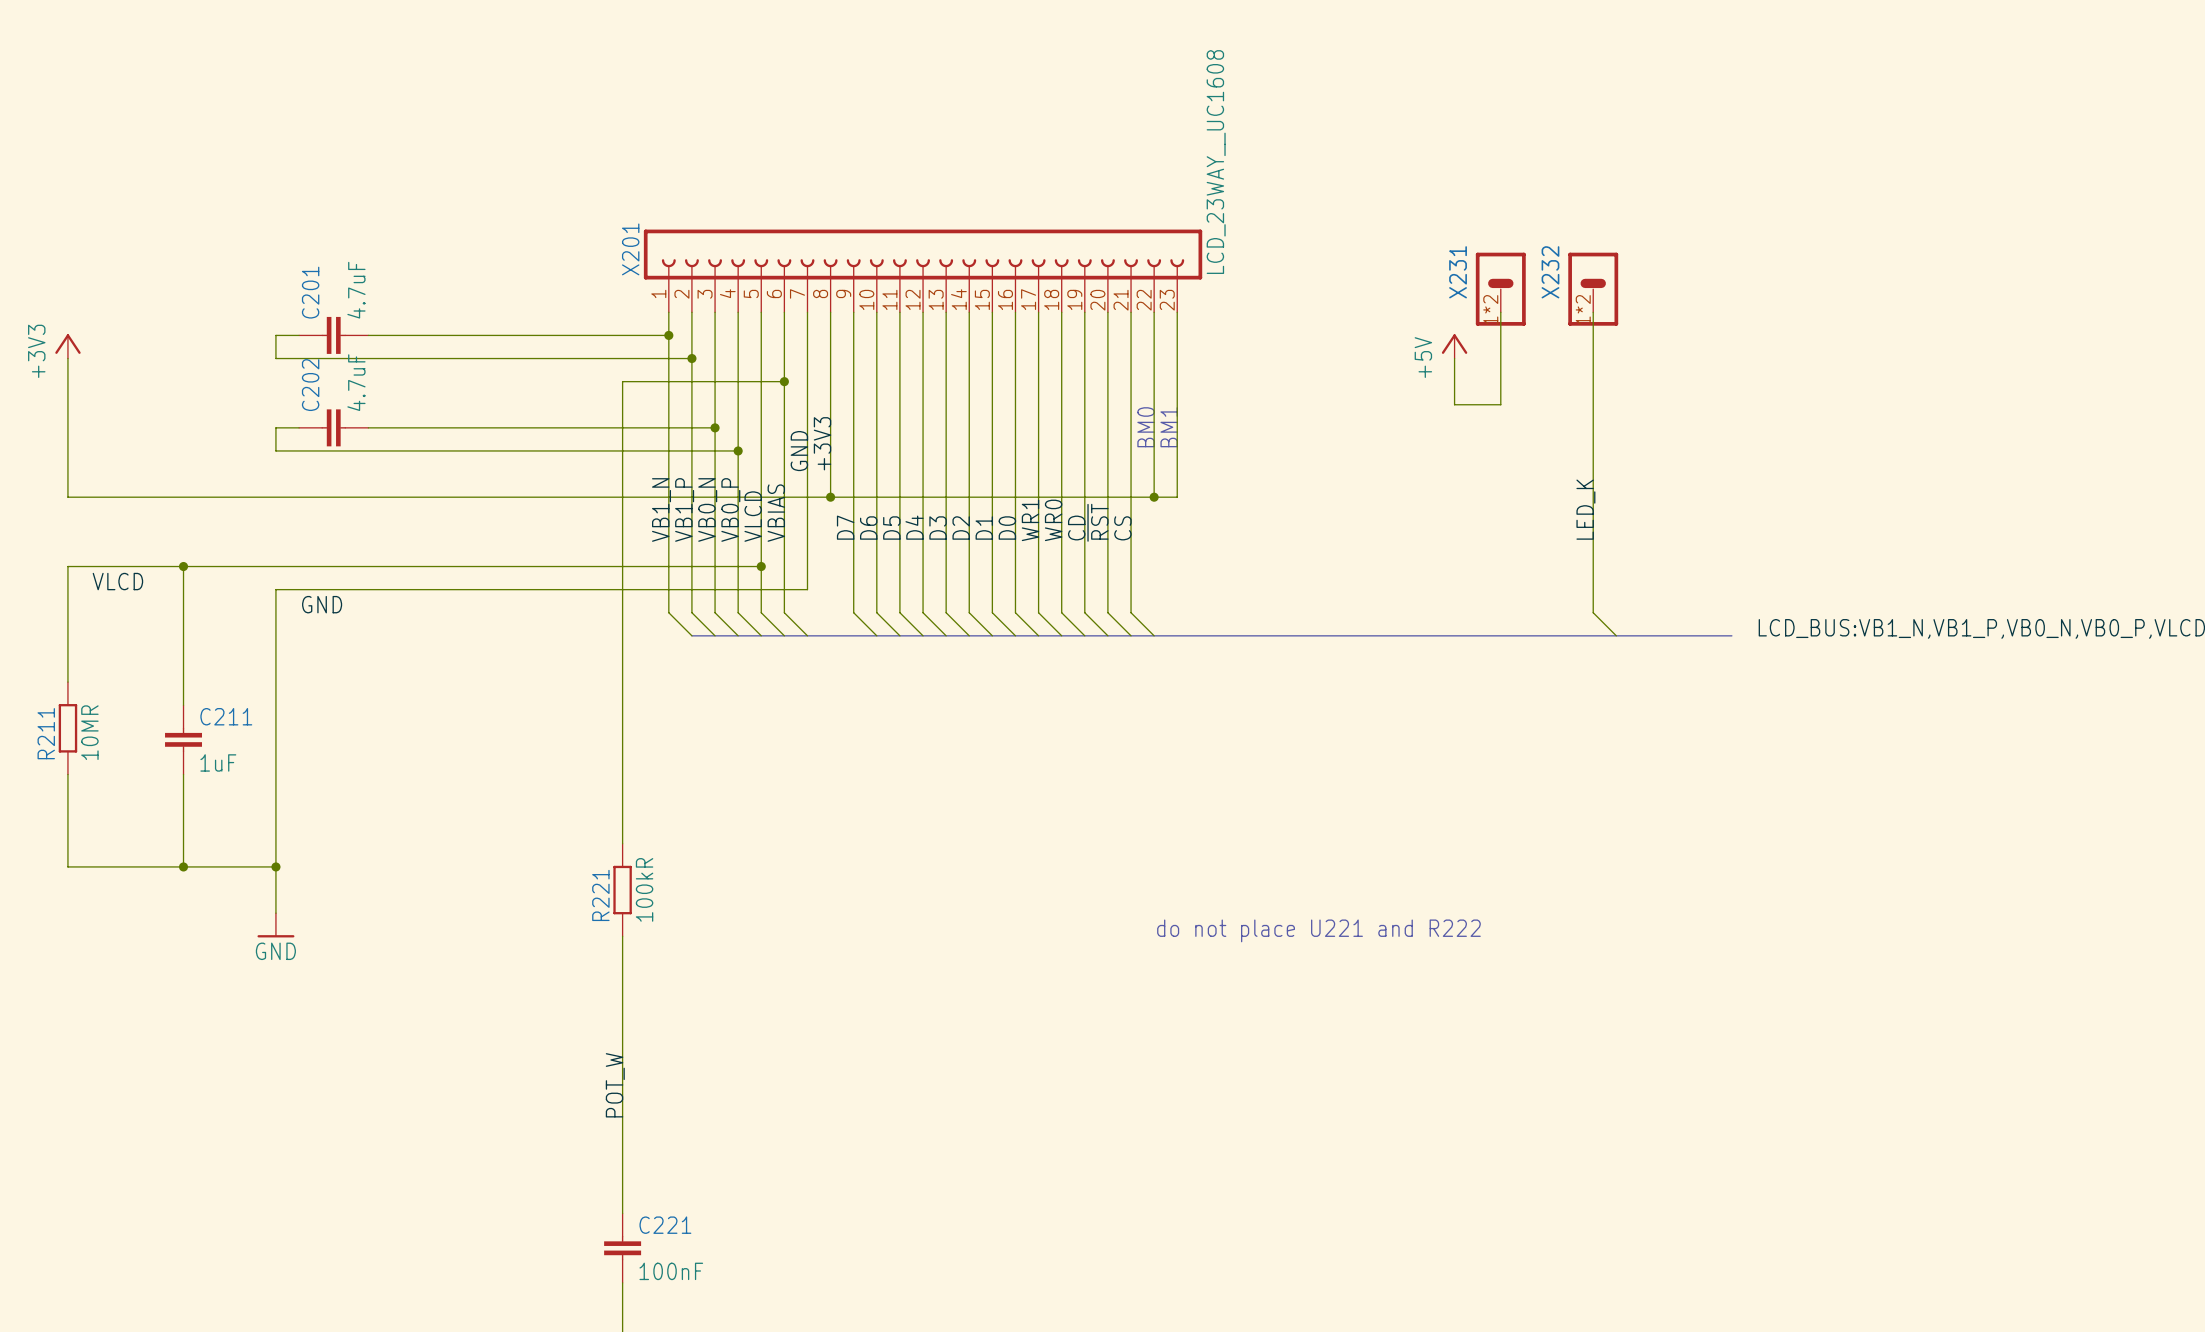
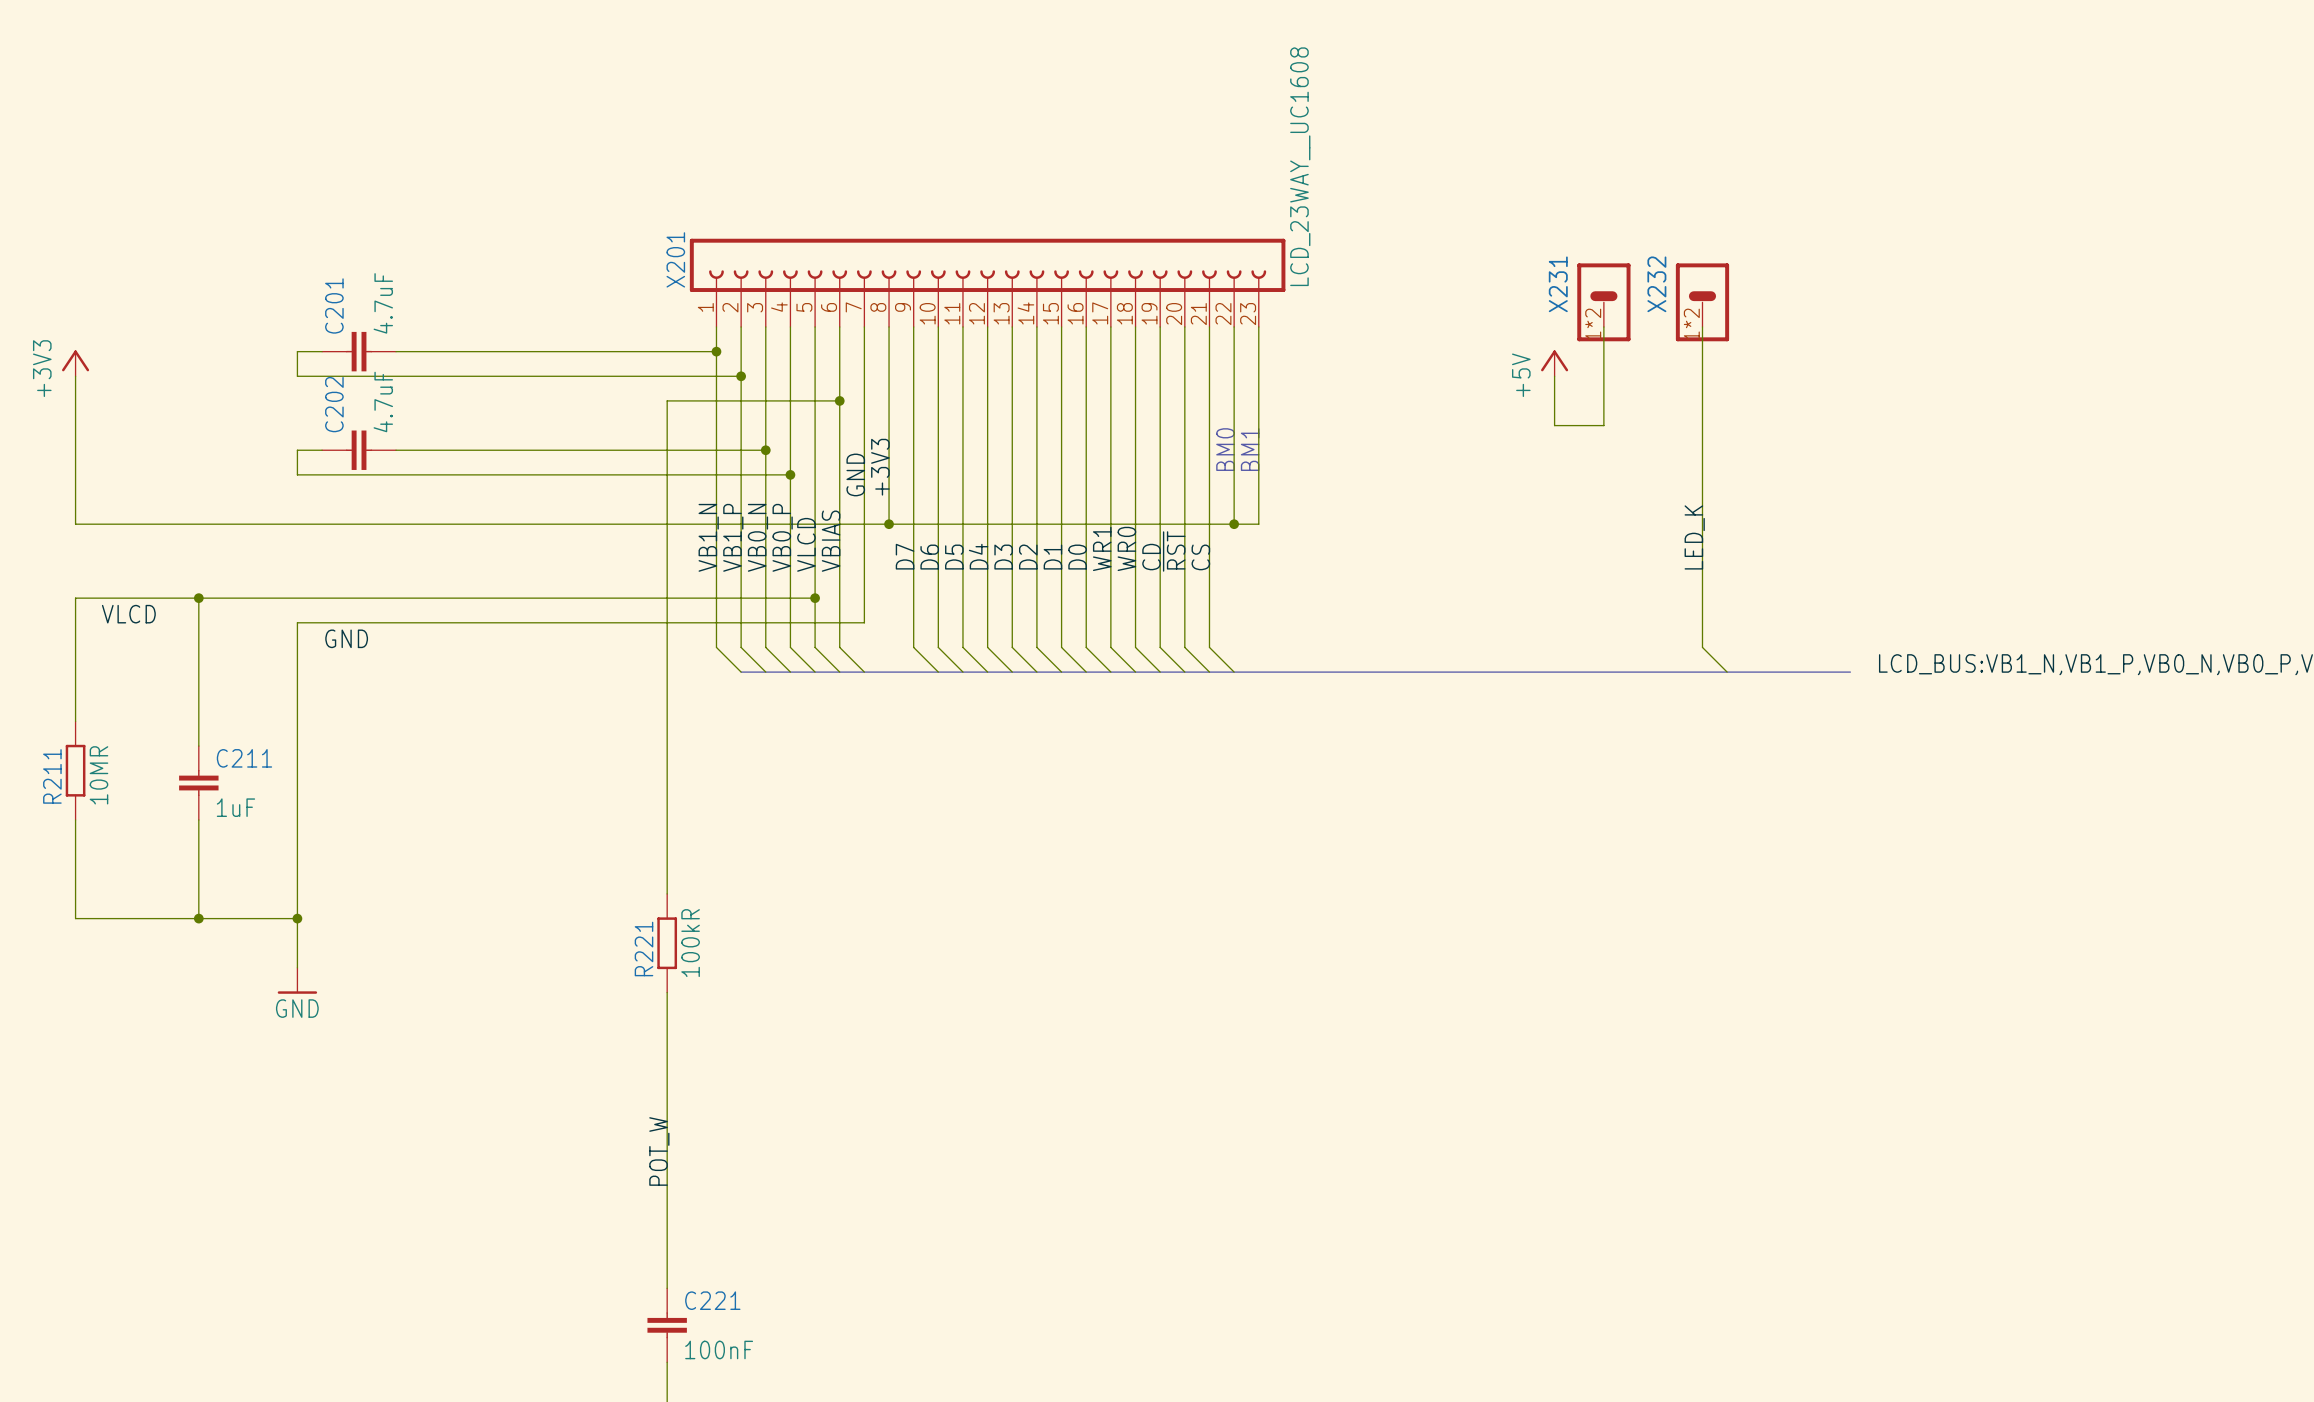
text: do not place U221 and R222 (1318, 930) -> none

